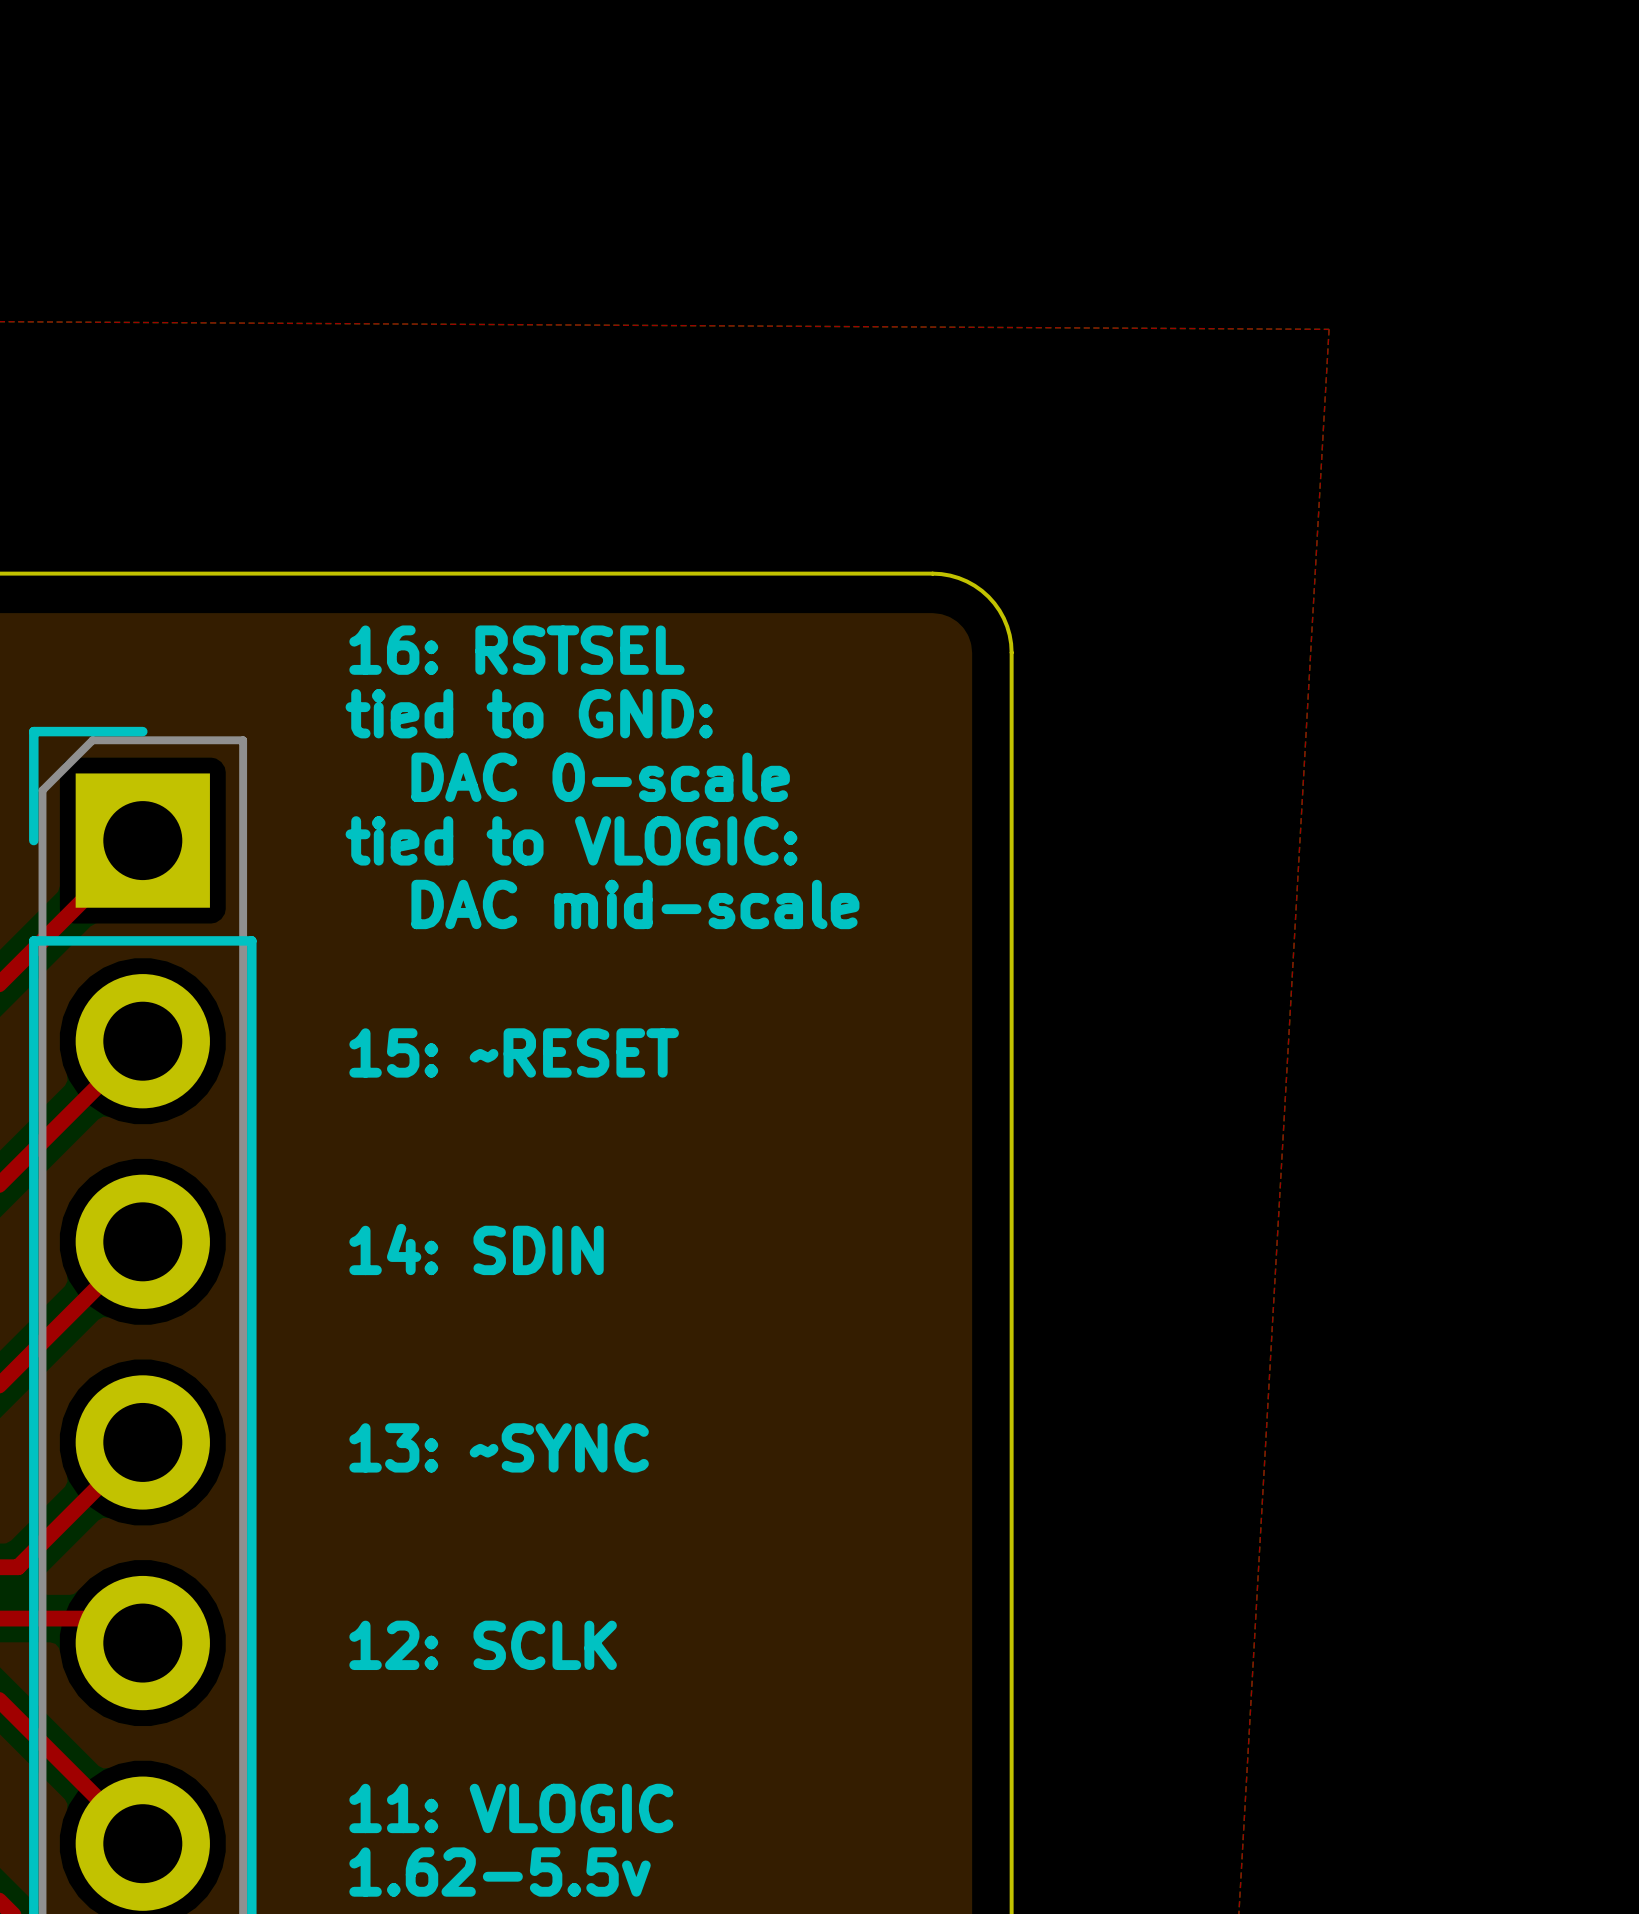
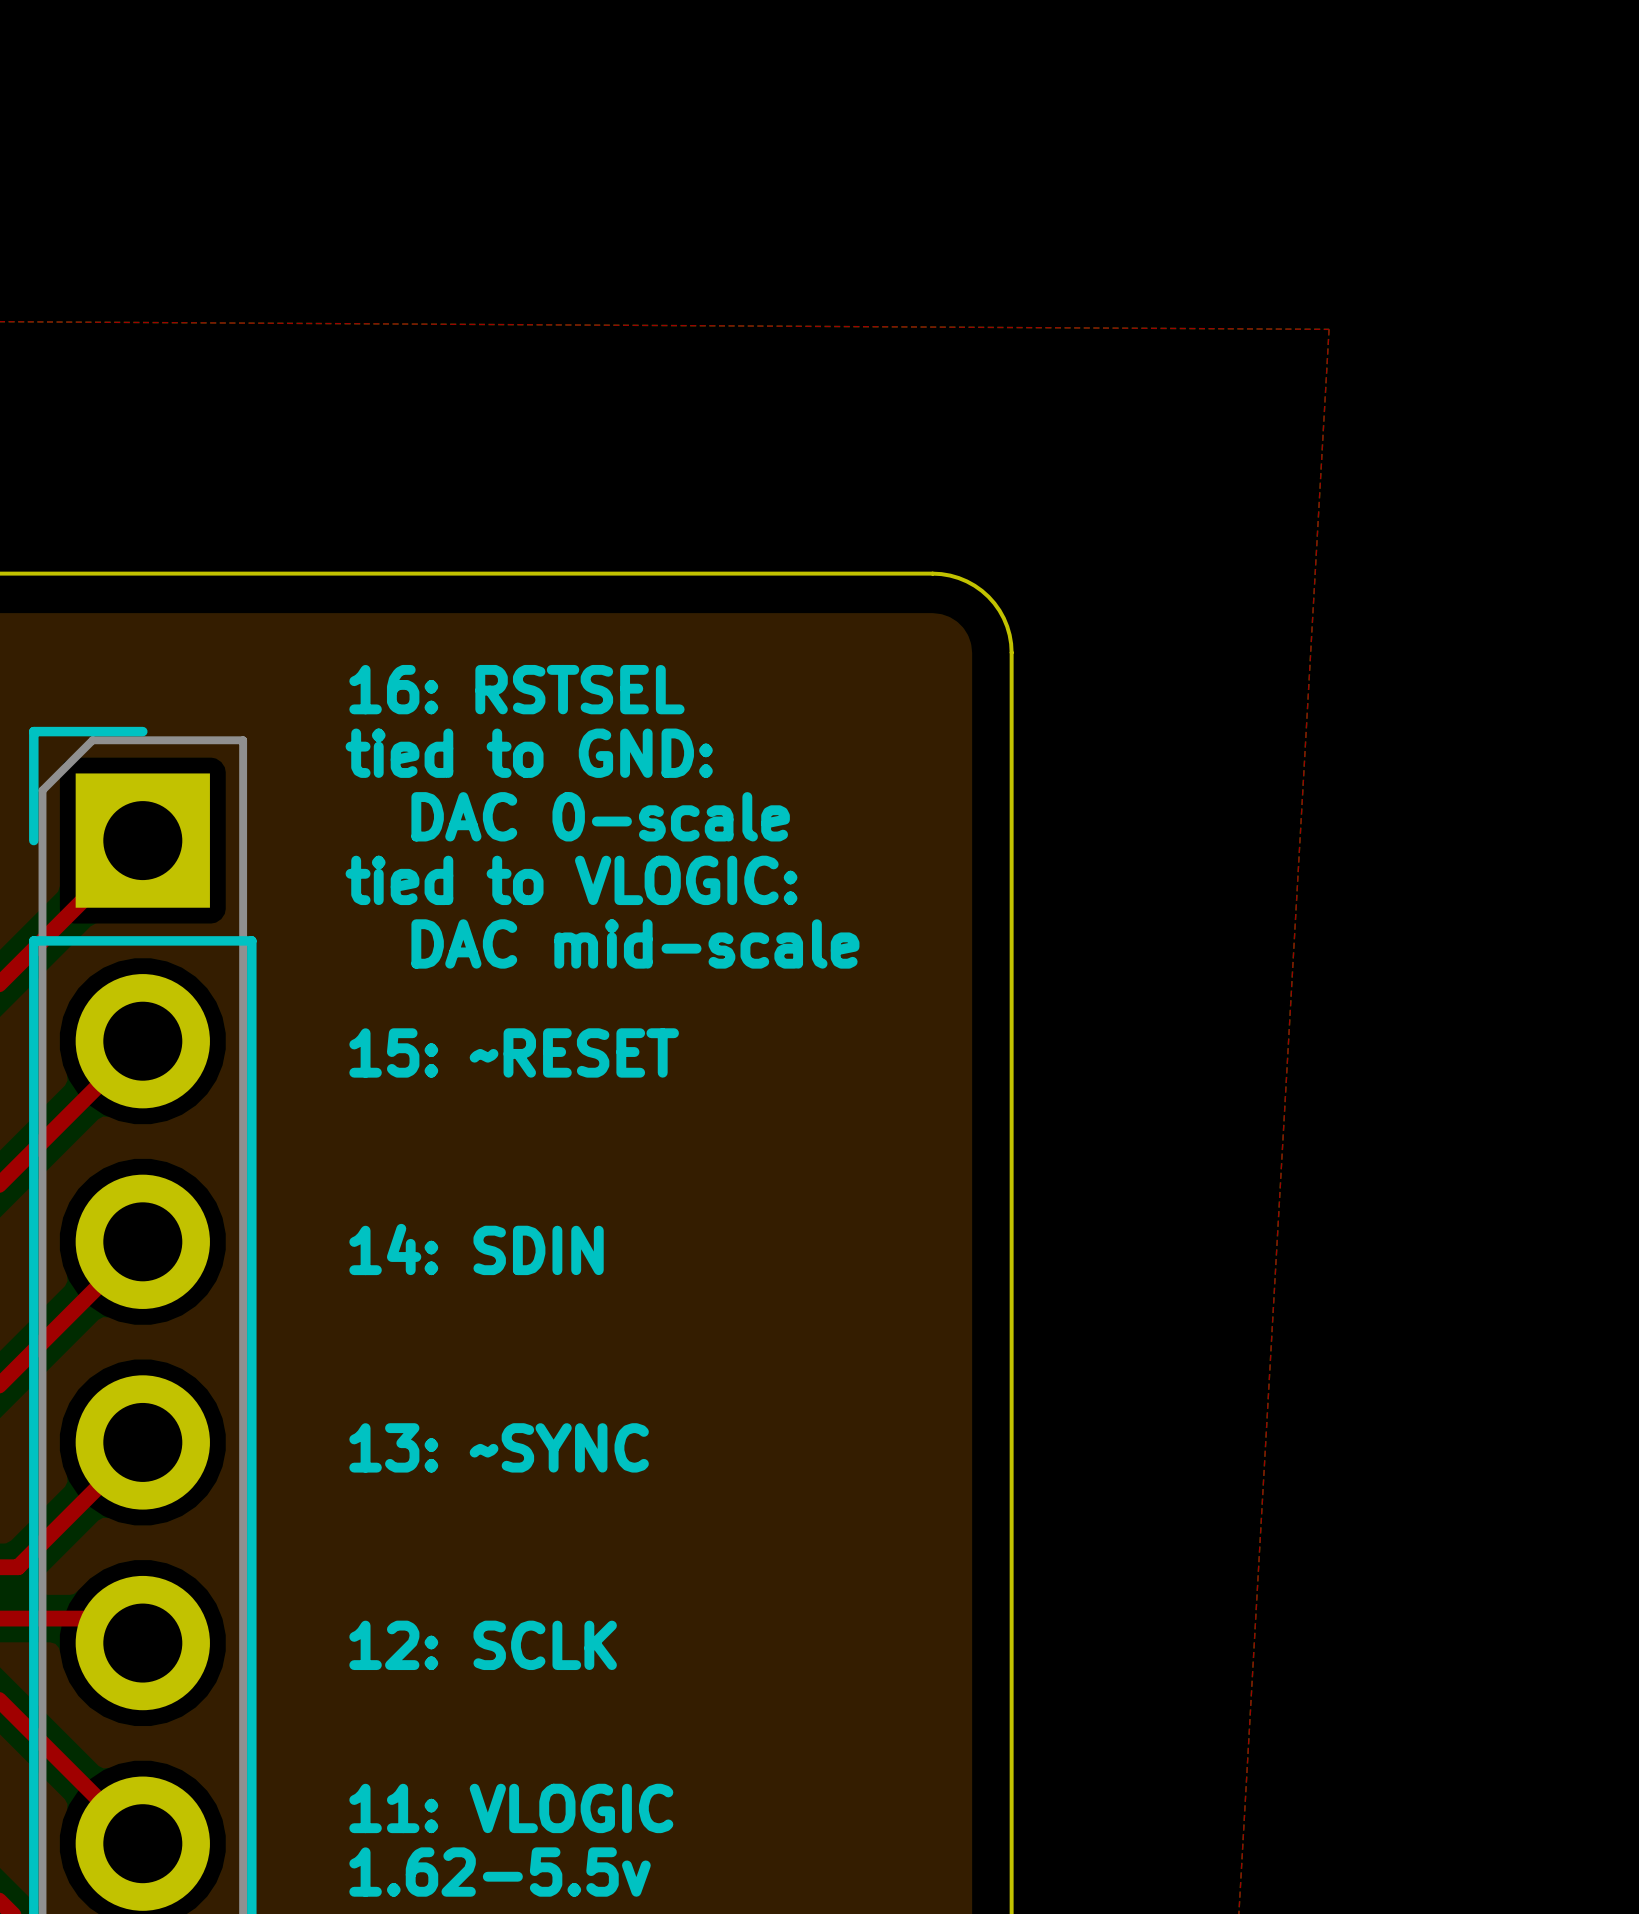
text position: 16: RSTSEL (516, 650) -> 16: RSTSEL (516, 689)
text position: tied to GND: (529, 713) -> tied to GND: (529, 753)
text position: DAC 0-scale (600, 777) -> DAC 0-scale (600, 816)
text position: tied to VLOGIC: (571, 840) -> tied to VLOGIC: (571, 880)
text position: DAC mid-scale (635, 904) -> DAC mid-scale (635, 943)

